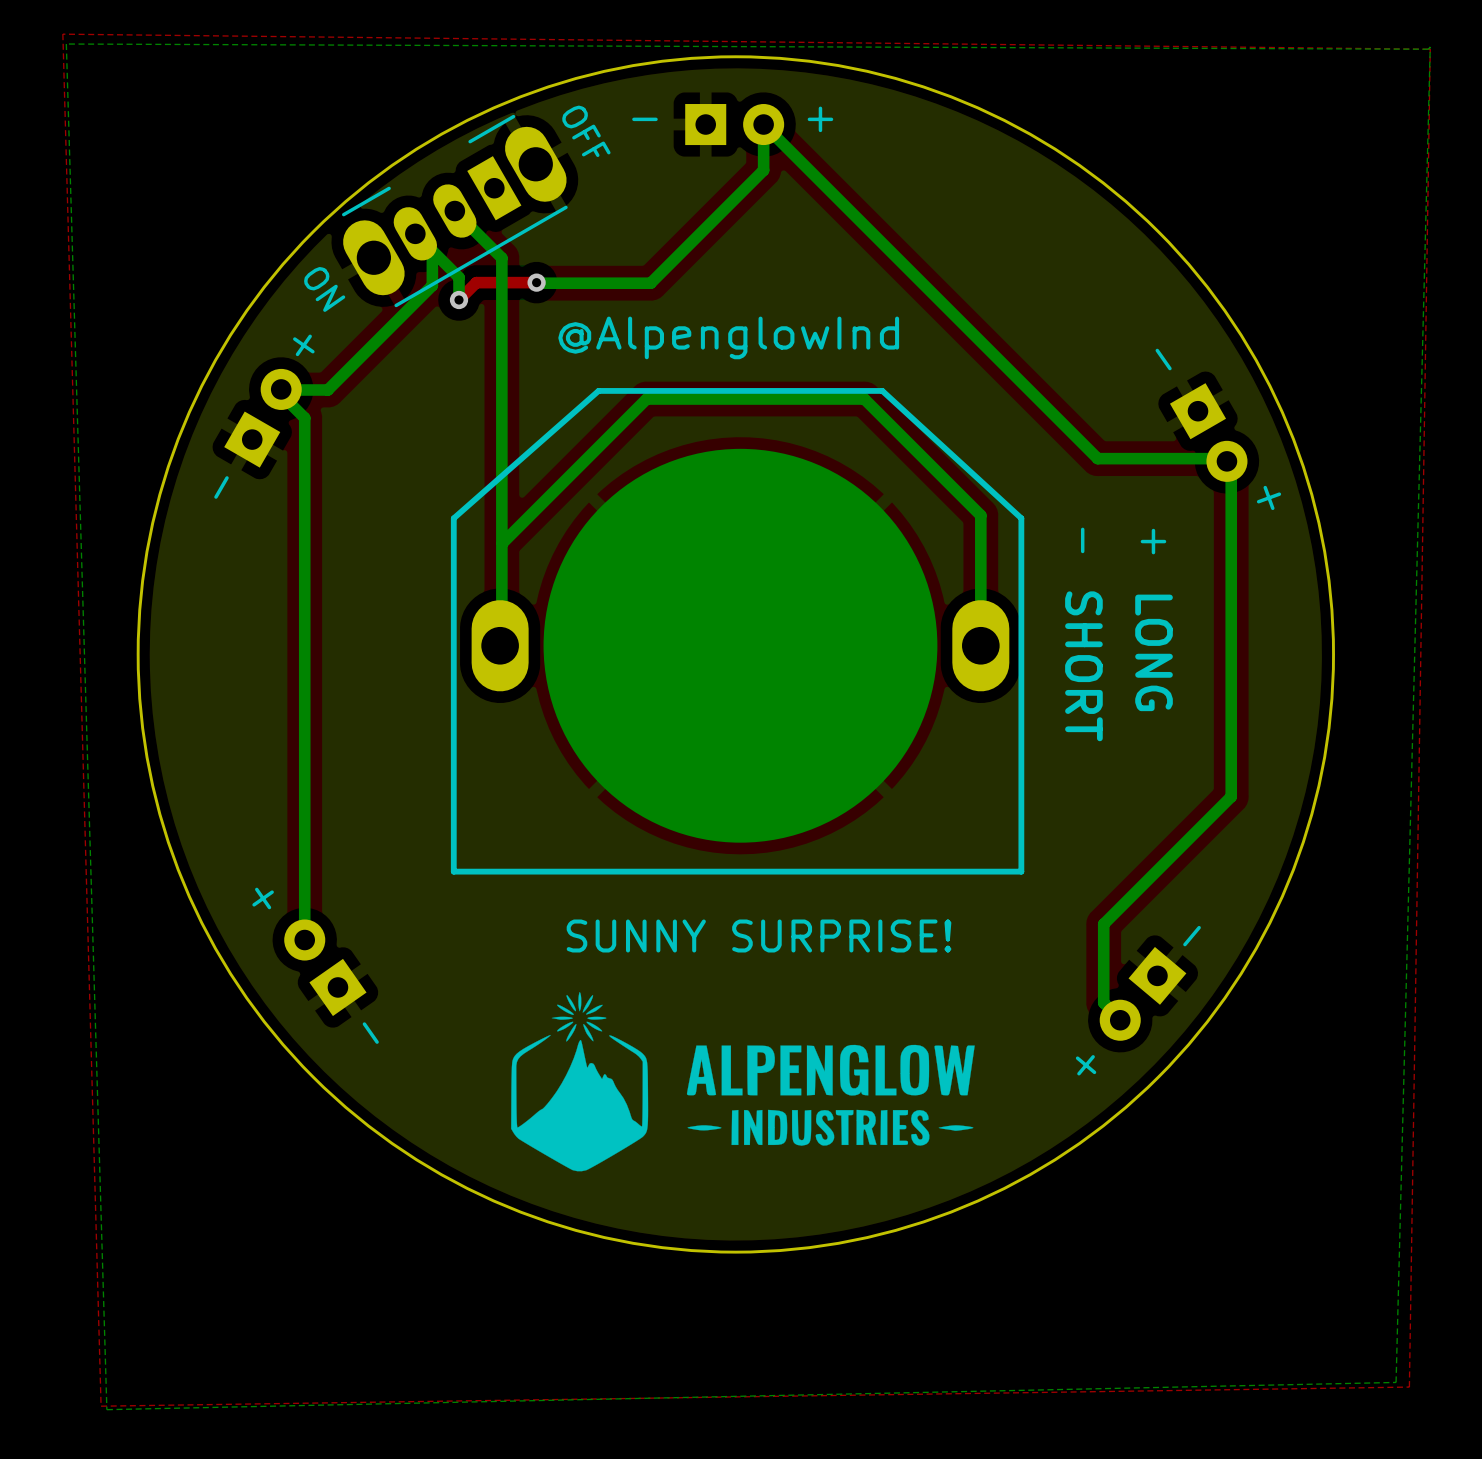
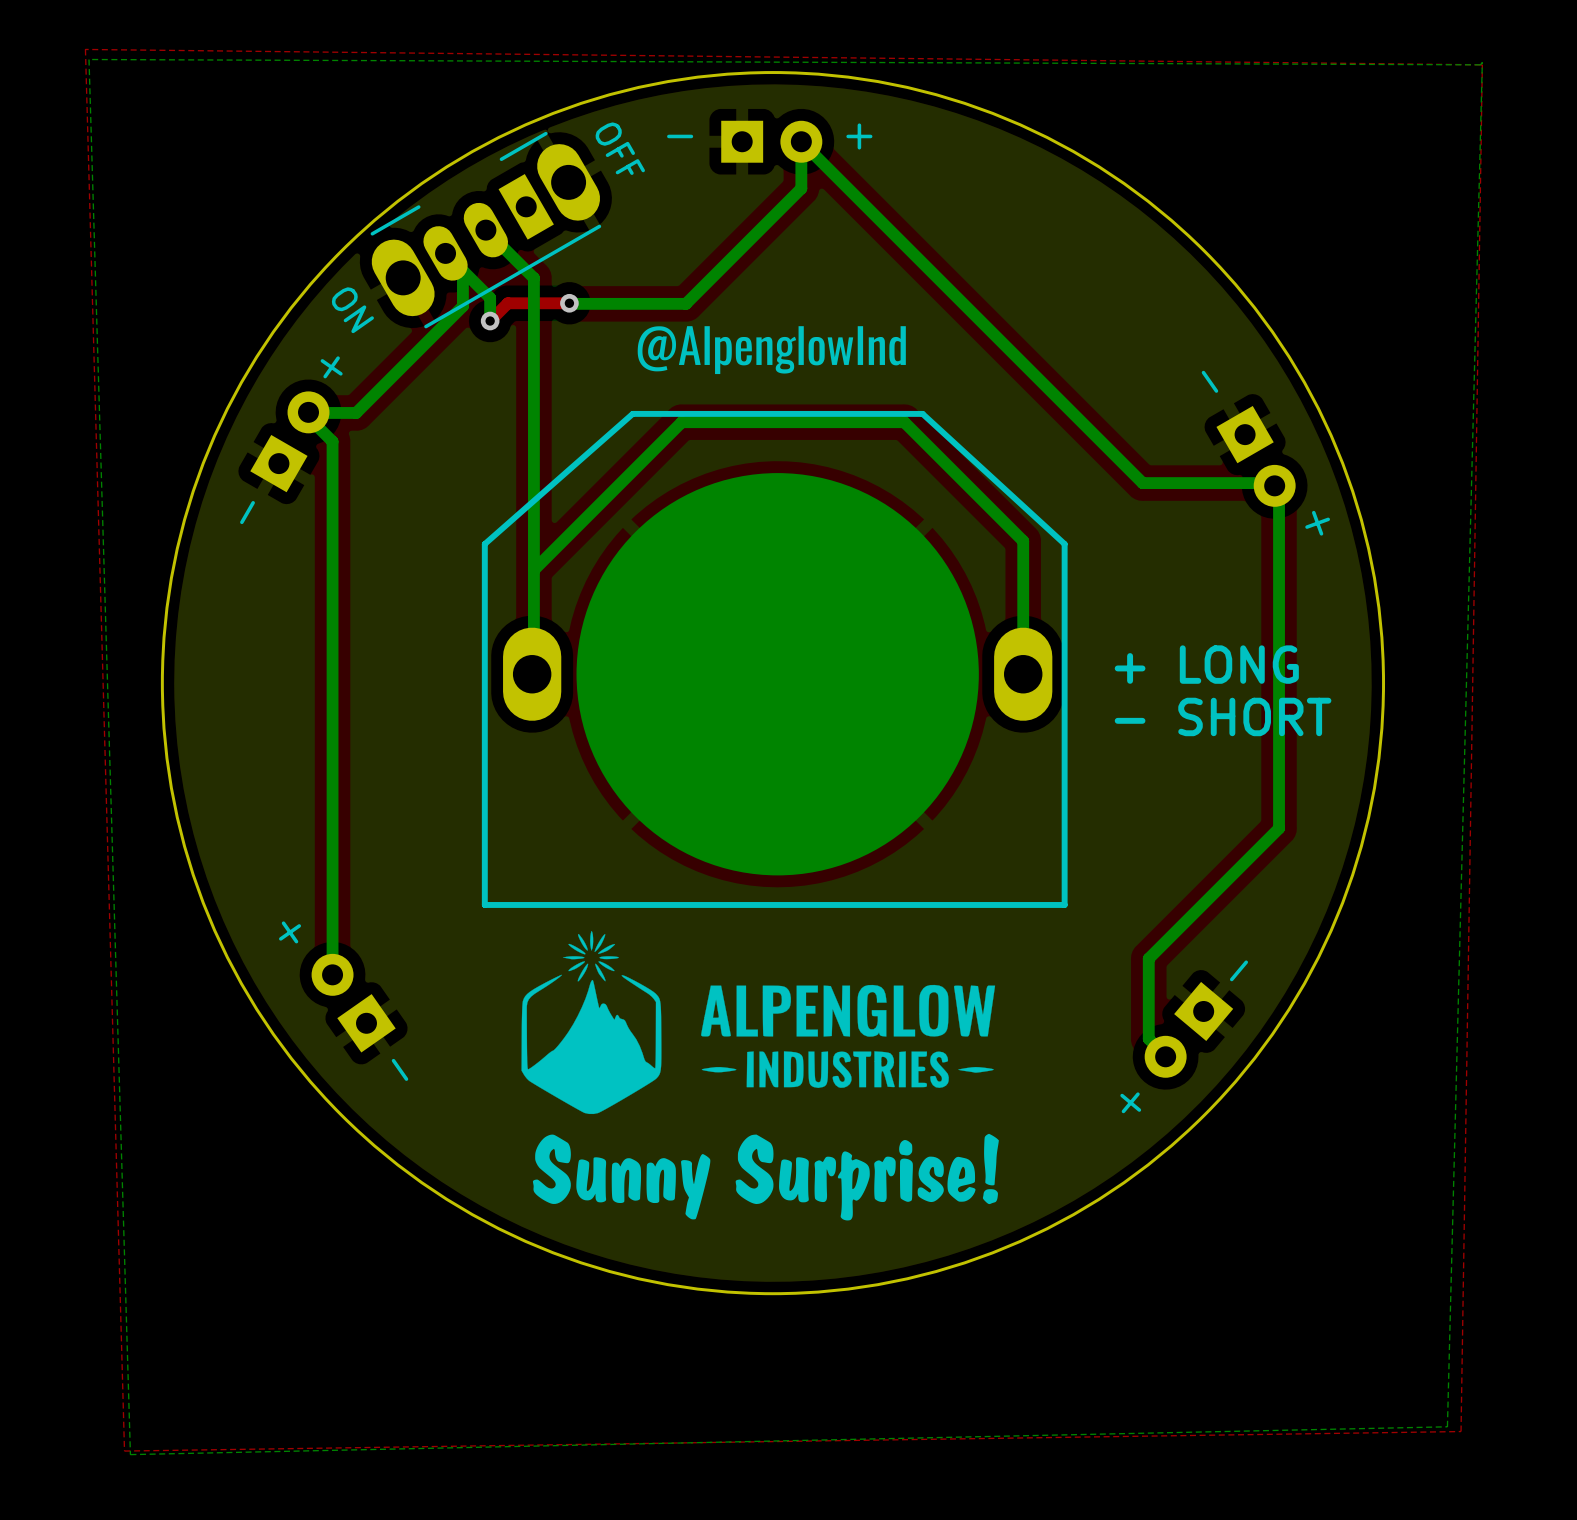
drawing: none -> [637, 326, 906, 375]
text: @AlpenglowInd (728, 337) -> none
text: - (1082, 540) -> none
text: + (1153, 541) -> none
text: LONG (1154, 652) -> + LONG (1206, 664)
text: SHORT (1083, 666) -> - SHORT (1223, 716)
text: SUNNY SURPRISE! (759, 935) -> none
drawing position: (742, 1081) -> (758, 1022)
drawing: none -> [532, 1133, 999, 1221]

